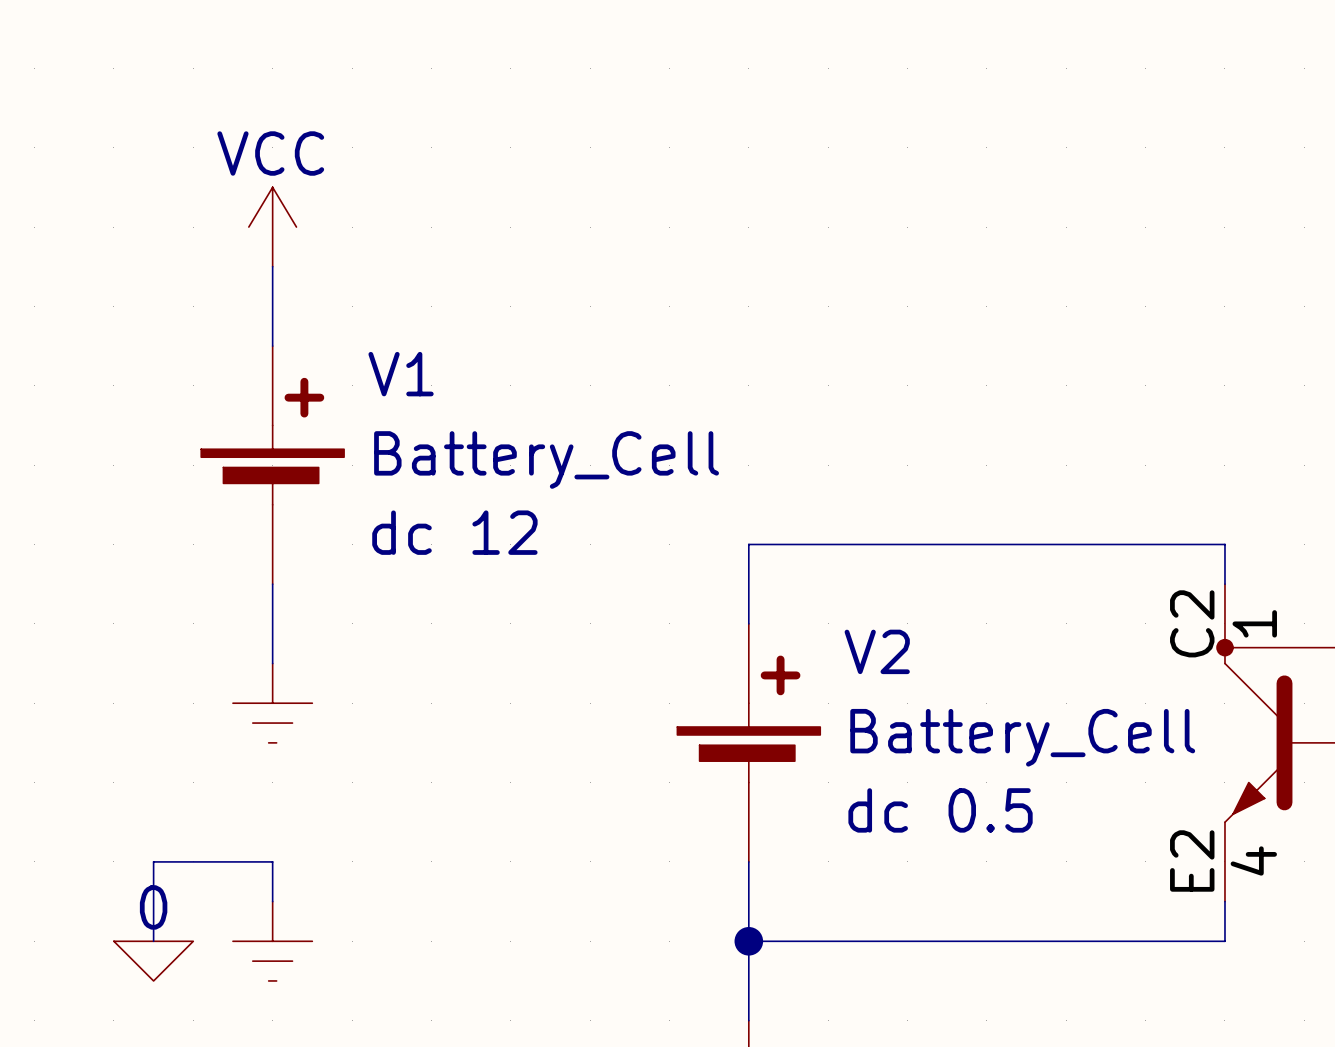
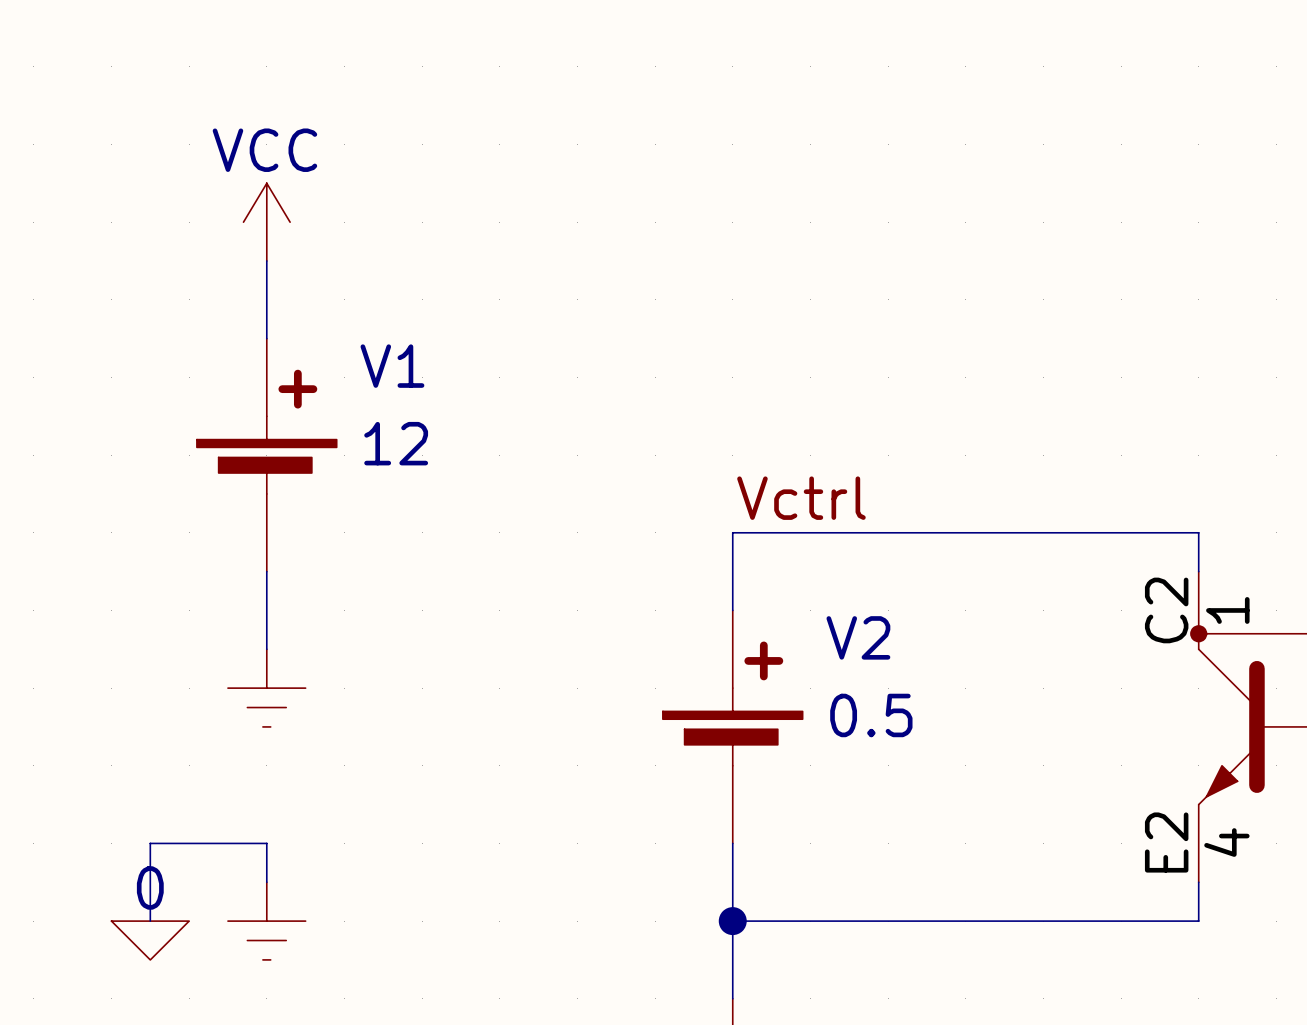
V1 value: Battery_Cell (546, 460) -> 12 (396, 443)
label: none -> Vctrl (801, 498)
V1 text: dc 12 (454, 532) -> none
V2 value: Battery_Cell (1022, 737) -> 0.5 (871, 715)
V2 text: dc 0.5 (940, 810) -> none

